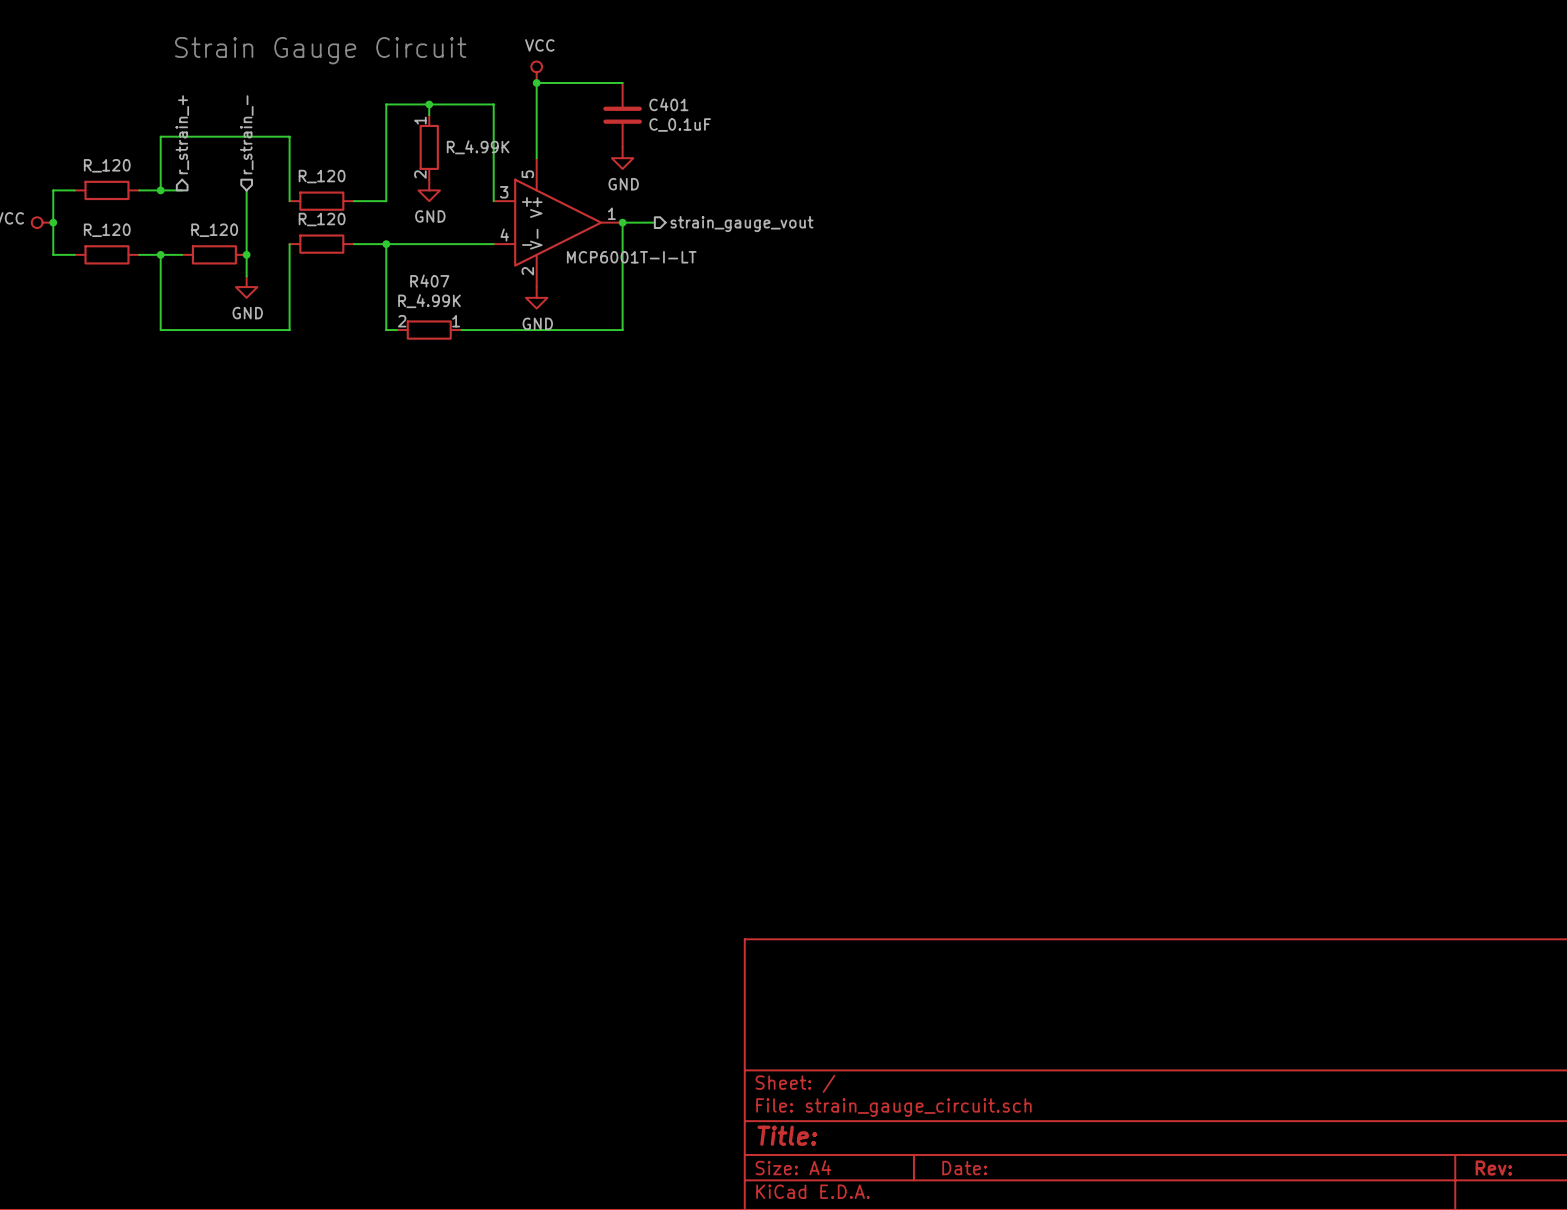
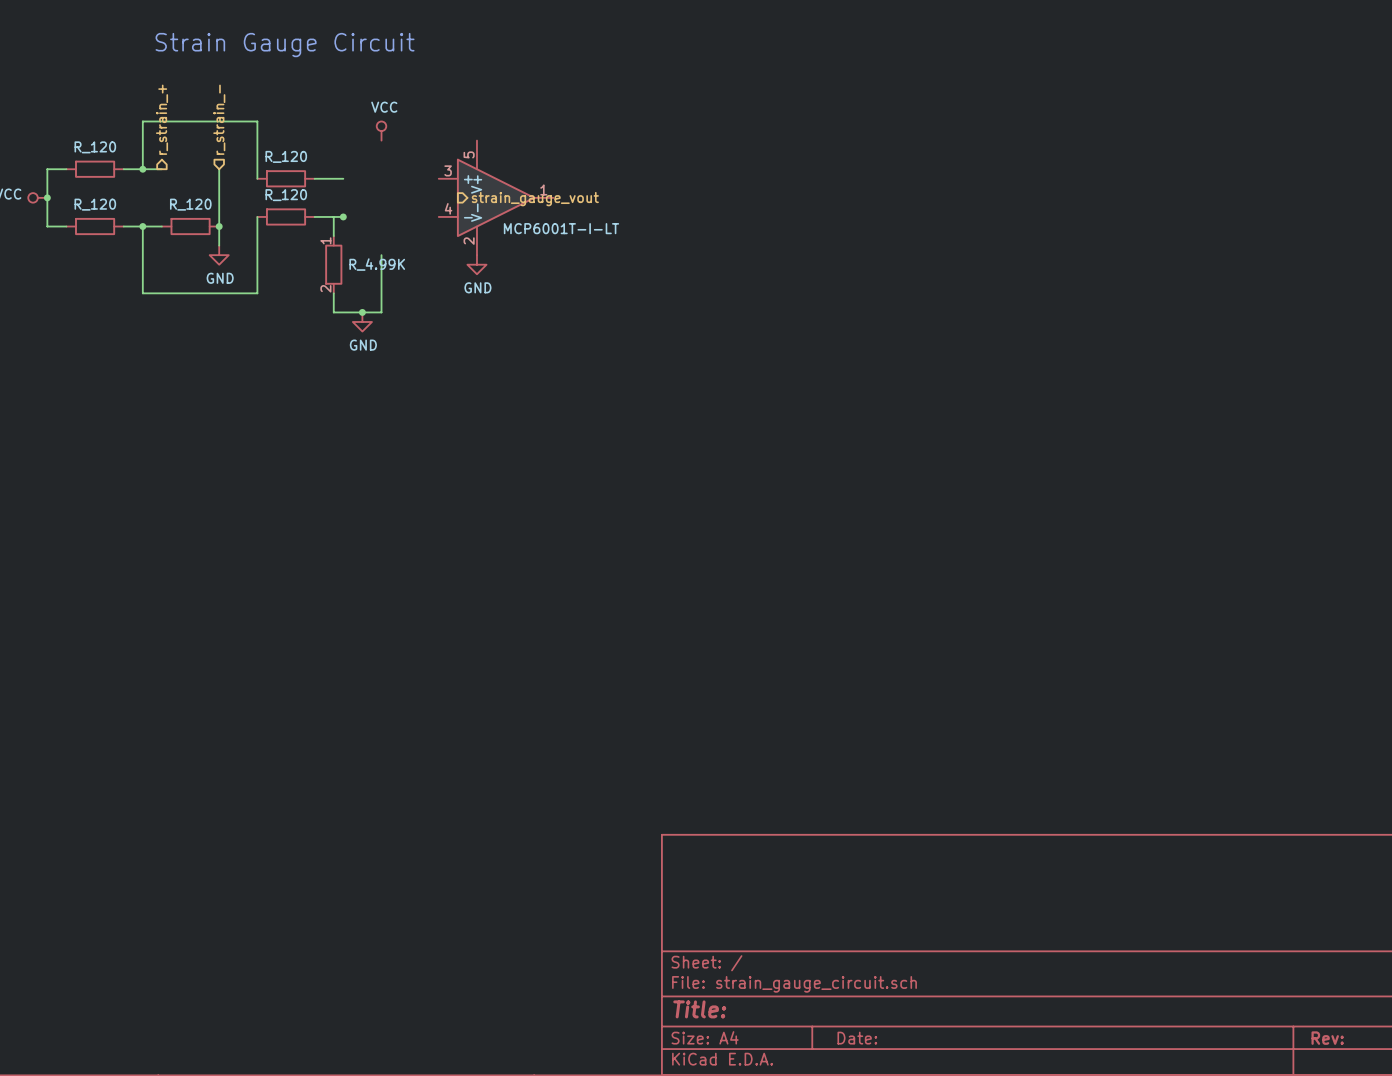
power symbol position: VCC (536, 72) -> VCC (381, 131)
junction: (536, 82) -> none
wire: (622, 82) (536, 82) (536, 158) -> none
wire: (429, 104) (429, 115) -> none
junction: (429, 104) -> none
C401: C_0.1uF (622, 115) -> none
part position: (429, 147) -> (333, 264)
power symbol: GND (622, 158) -> none
power symbol: GND (429, 190) -> none
wire: (386, 201) (386, 104) (493, 104) (493, 201) -> none
junction: (622, 222) -> none
wire: (654, 222) (622, 222) (622, 330) (461, 330) -> none
hierarchical label position: strain_gauge_vout (741, 224) -> strain_gauge_vout (535, 199)
wire: none -> (333, 216) (333, 236)
wire: (493, 244) (386, 244) (386, 330) (397, 330) -> none
wire: none -> (381, 255) (381, 312) (333, 312) (333, 293)
R407: R_4.99K (429, 330) -> none
junction: none -> (362, 312)
power symbol: none -> GND (362, 321)

